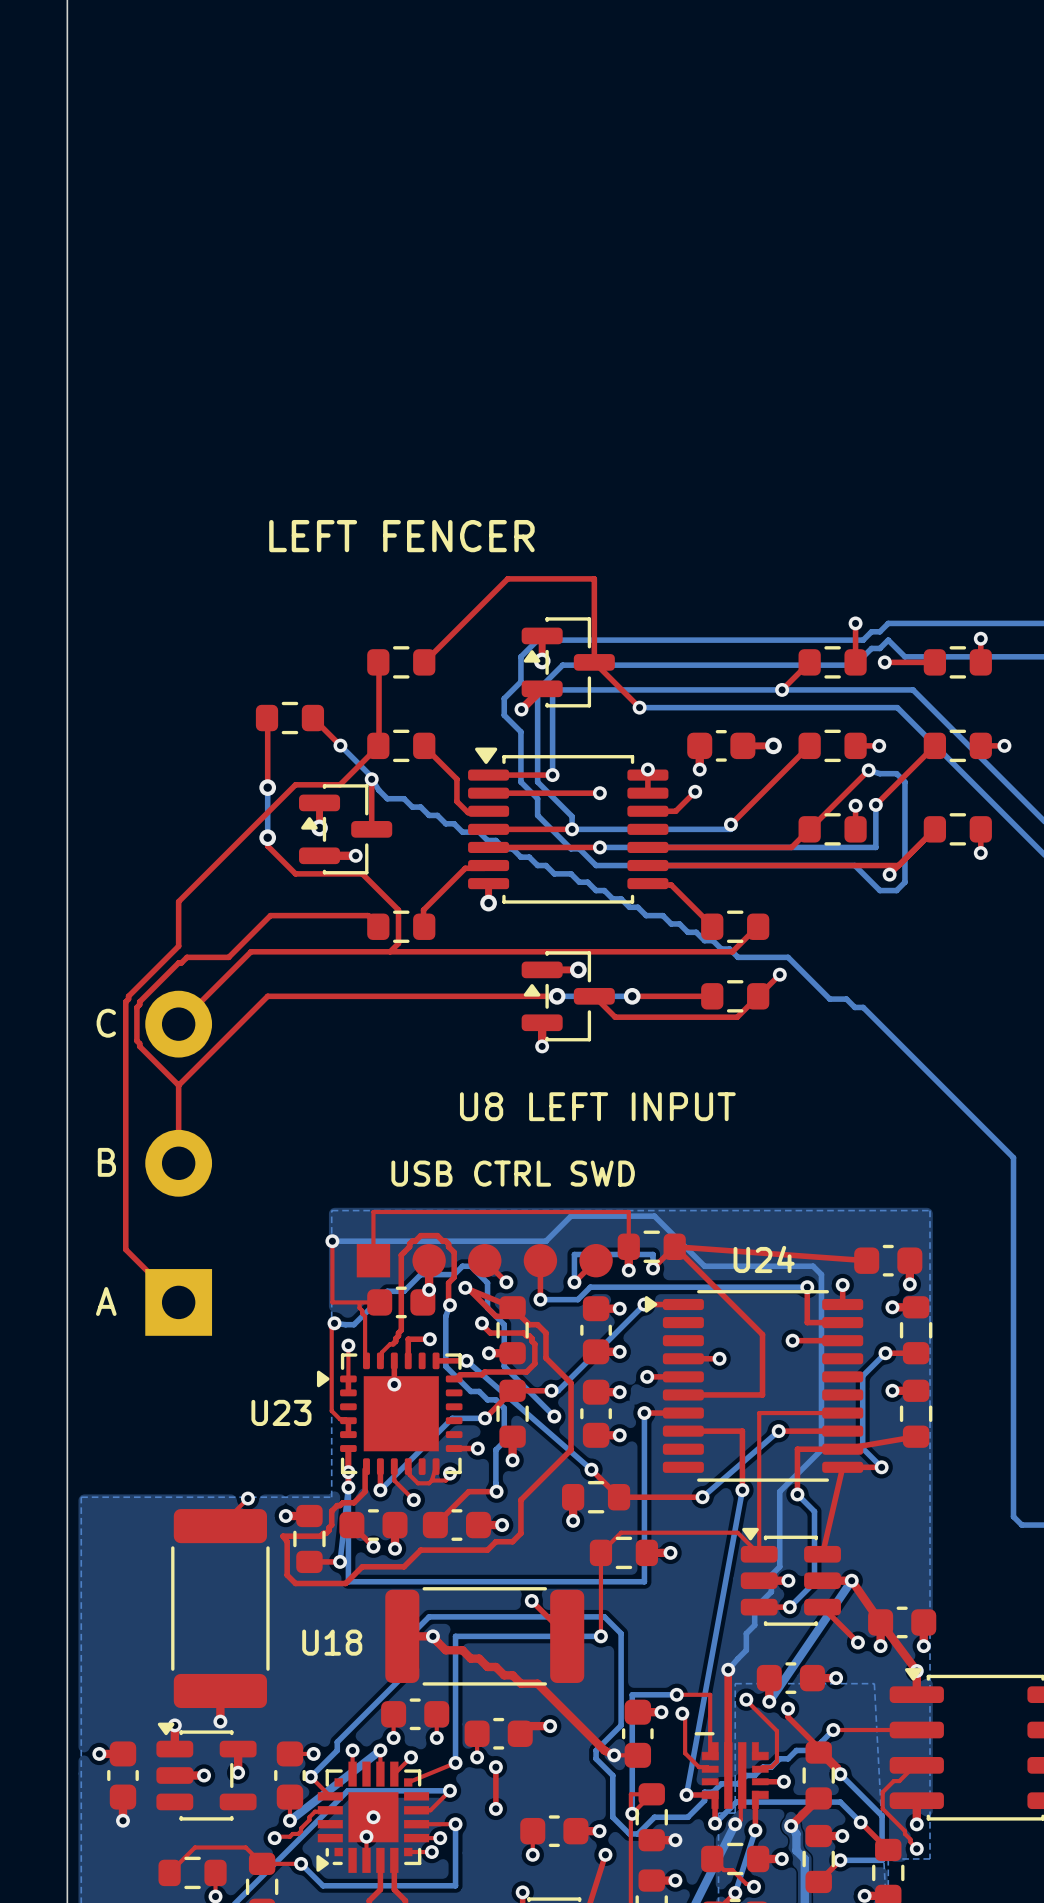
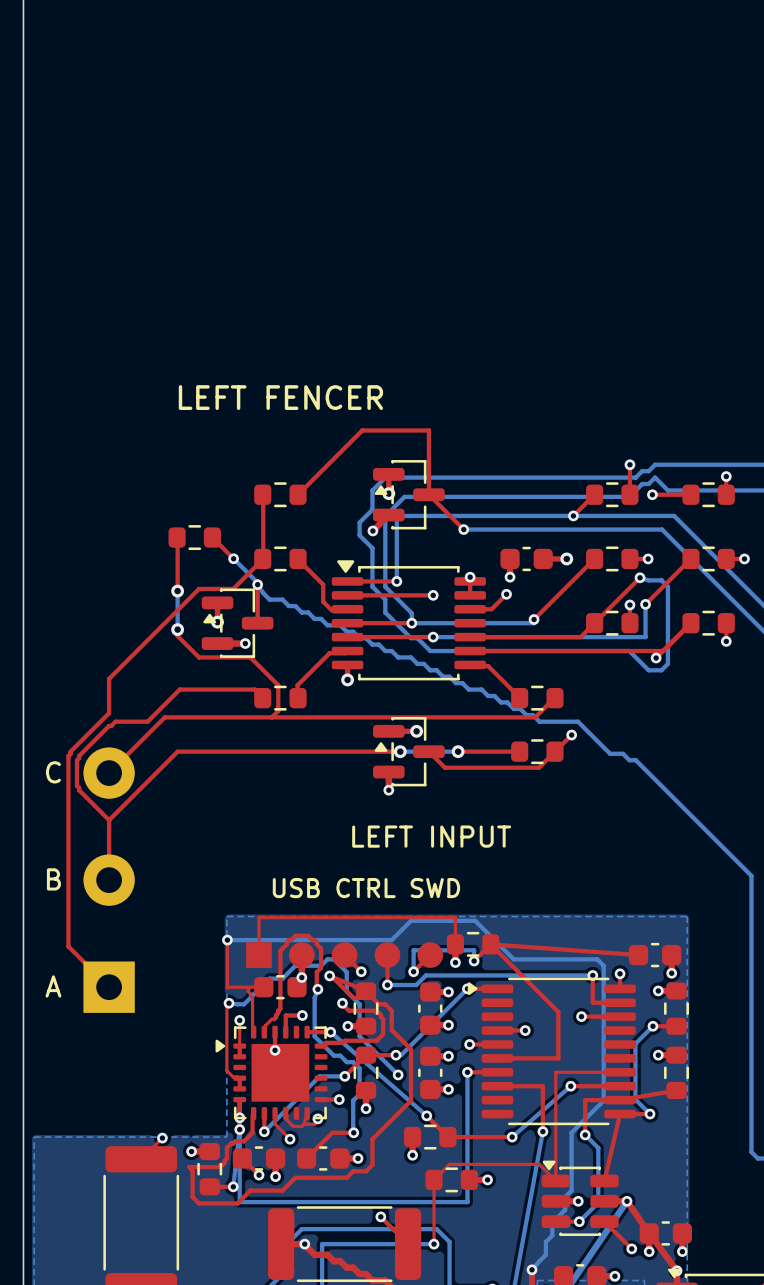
text: U8 LEFT INPUT (597, 1106) -> LEFT INPUT (431, 836)
text: U24 (764, 1259) -> none
text: U23 (281, 1412) -> none
text: U18 (332, 1642) -> none

